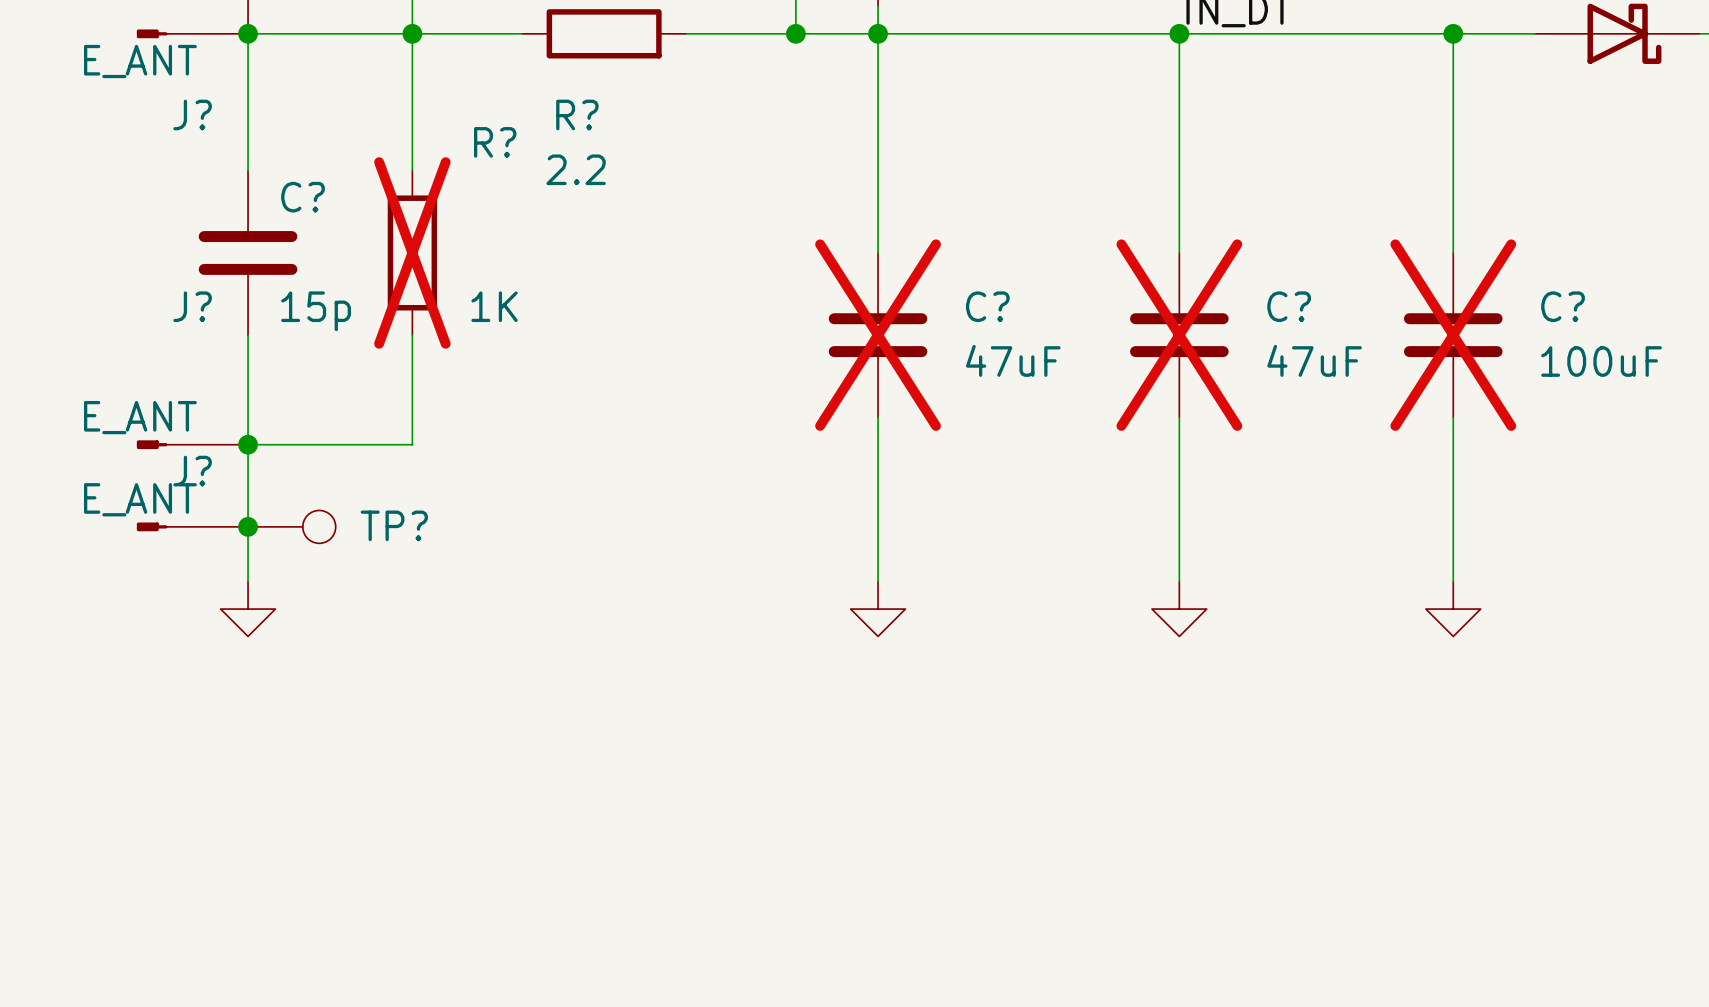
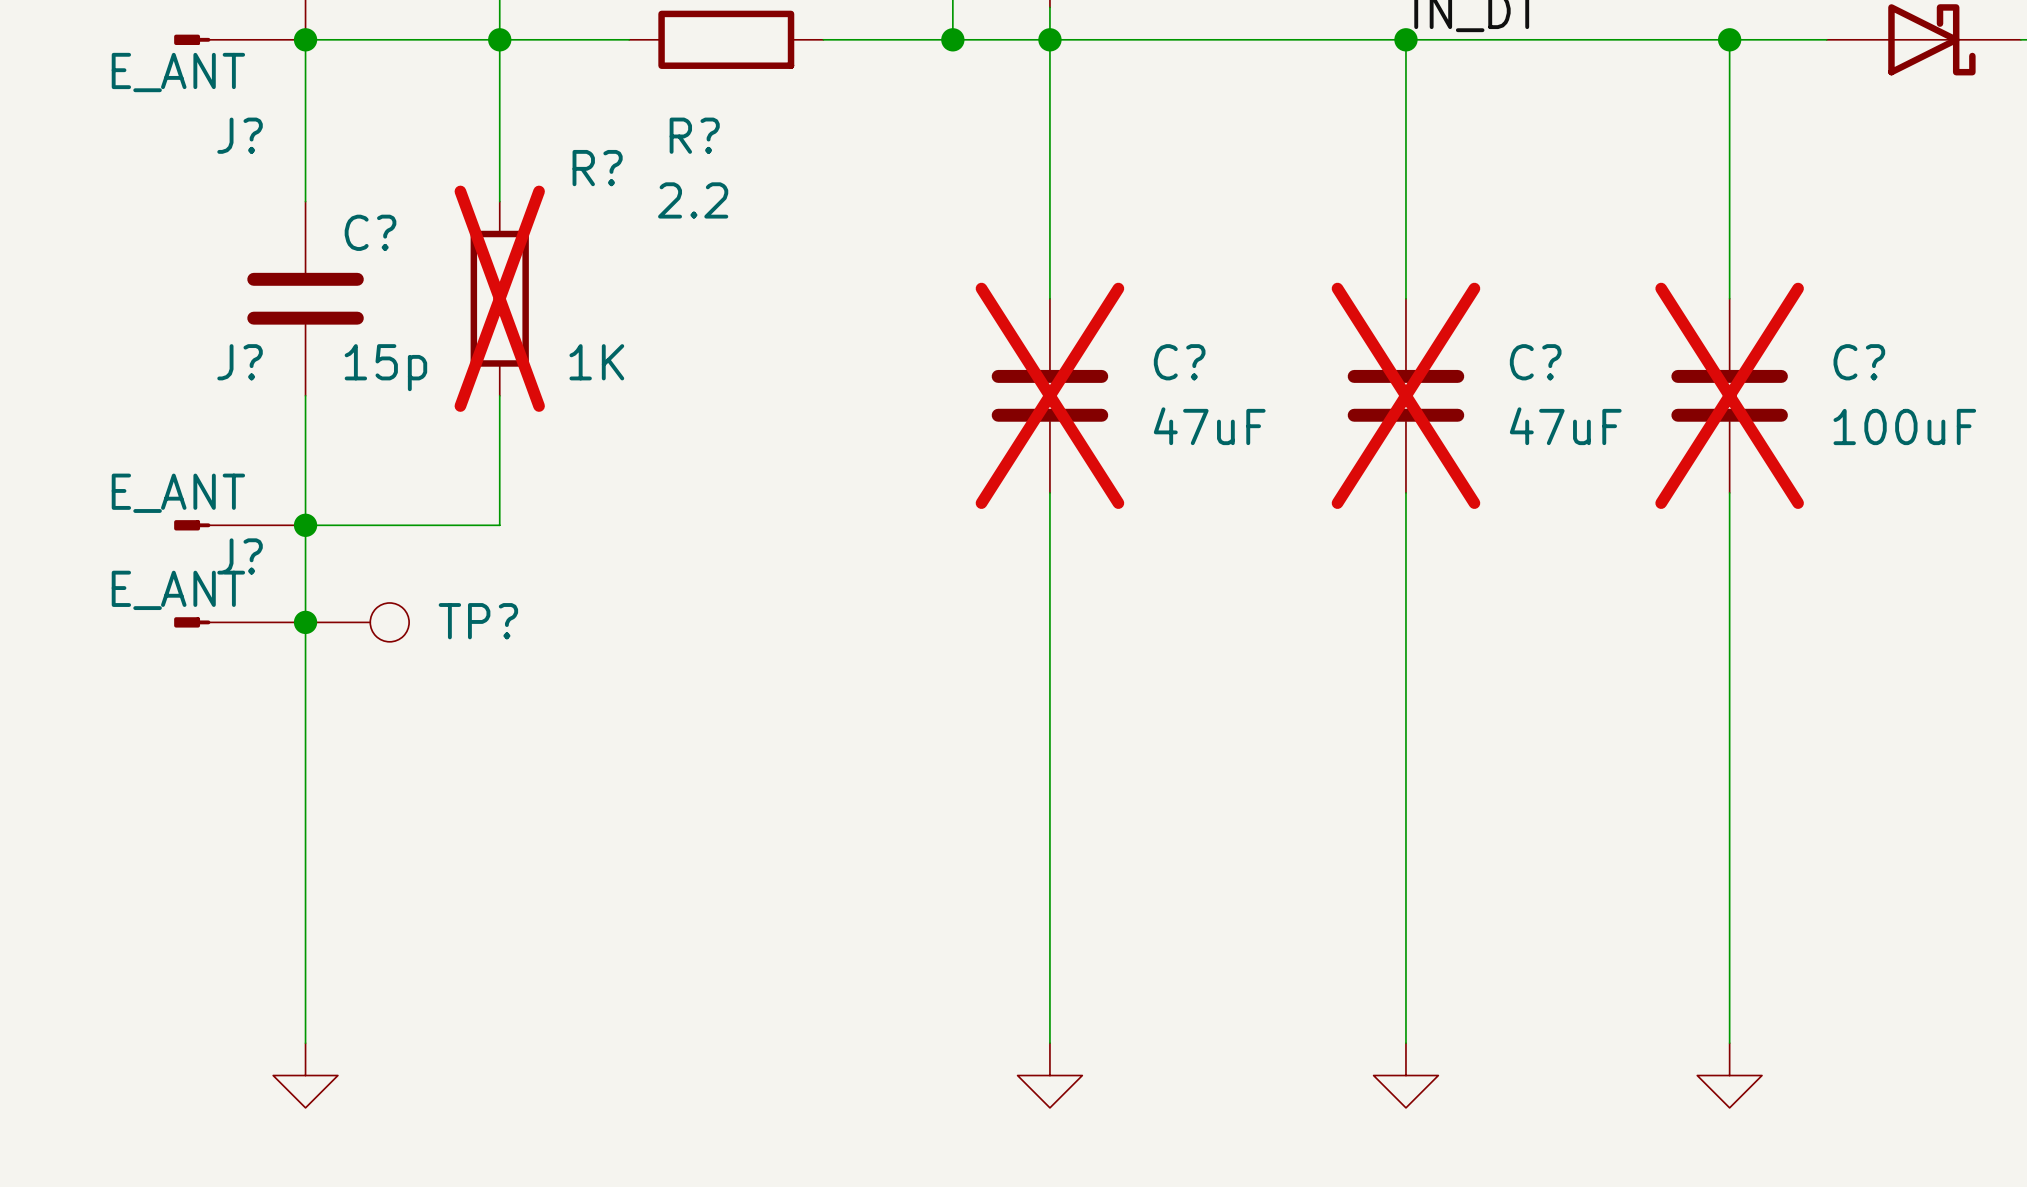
wire: none -> (305, 687) (305, 1043)
wire: none -> (1049, 687) (1049, 1043)
wire: none -> (1405, 687) (1405, 1043)
wire: none -> (1729, 687) (1729, 1043)
power symbol position: (248, 609) -> (305, 1075)
power symbol: (878, 609) -> none
power symbol: (1179, 609) -> none
power symbol: (1453, 609) -> none
power symbol: none -> (1049, 1075)
power symbol: none -> (1405, 1075)
power symbol: none -> (1729, 1075)

